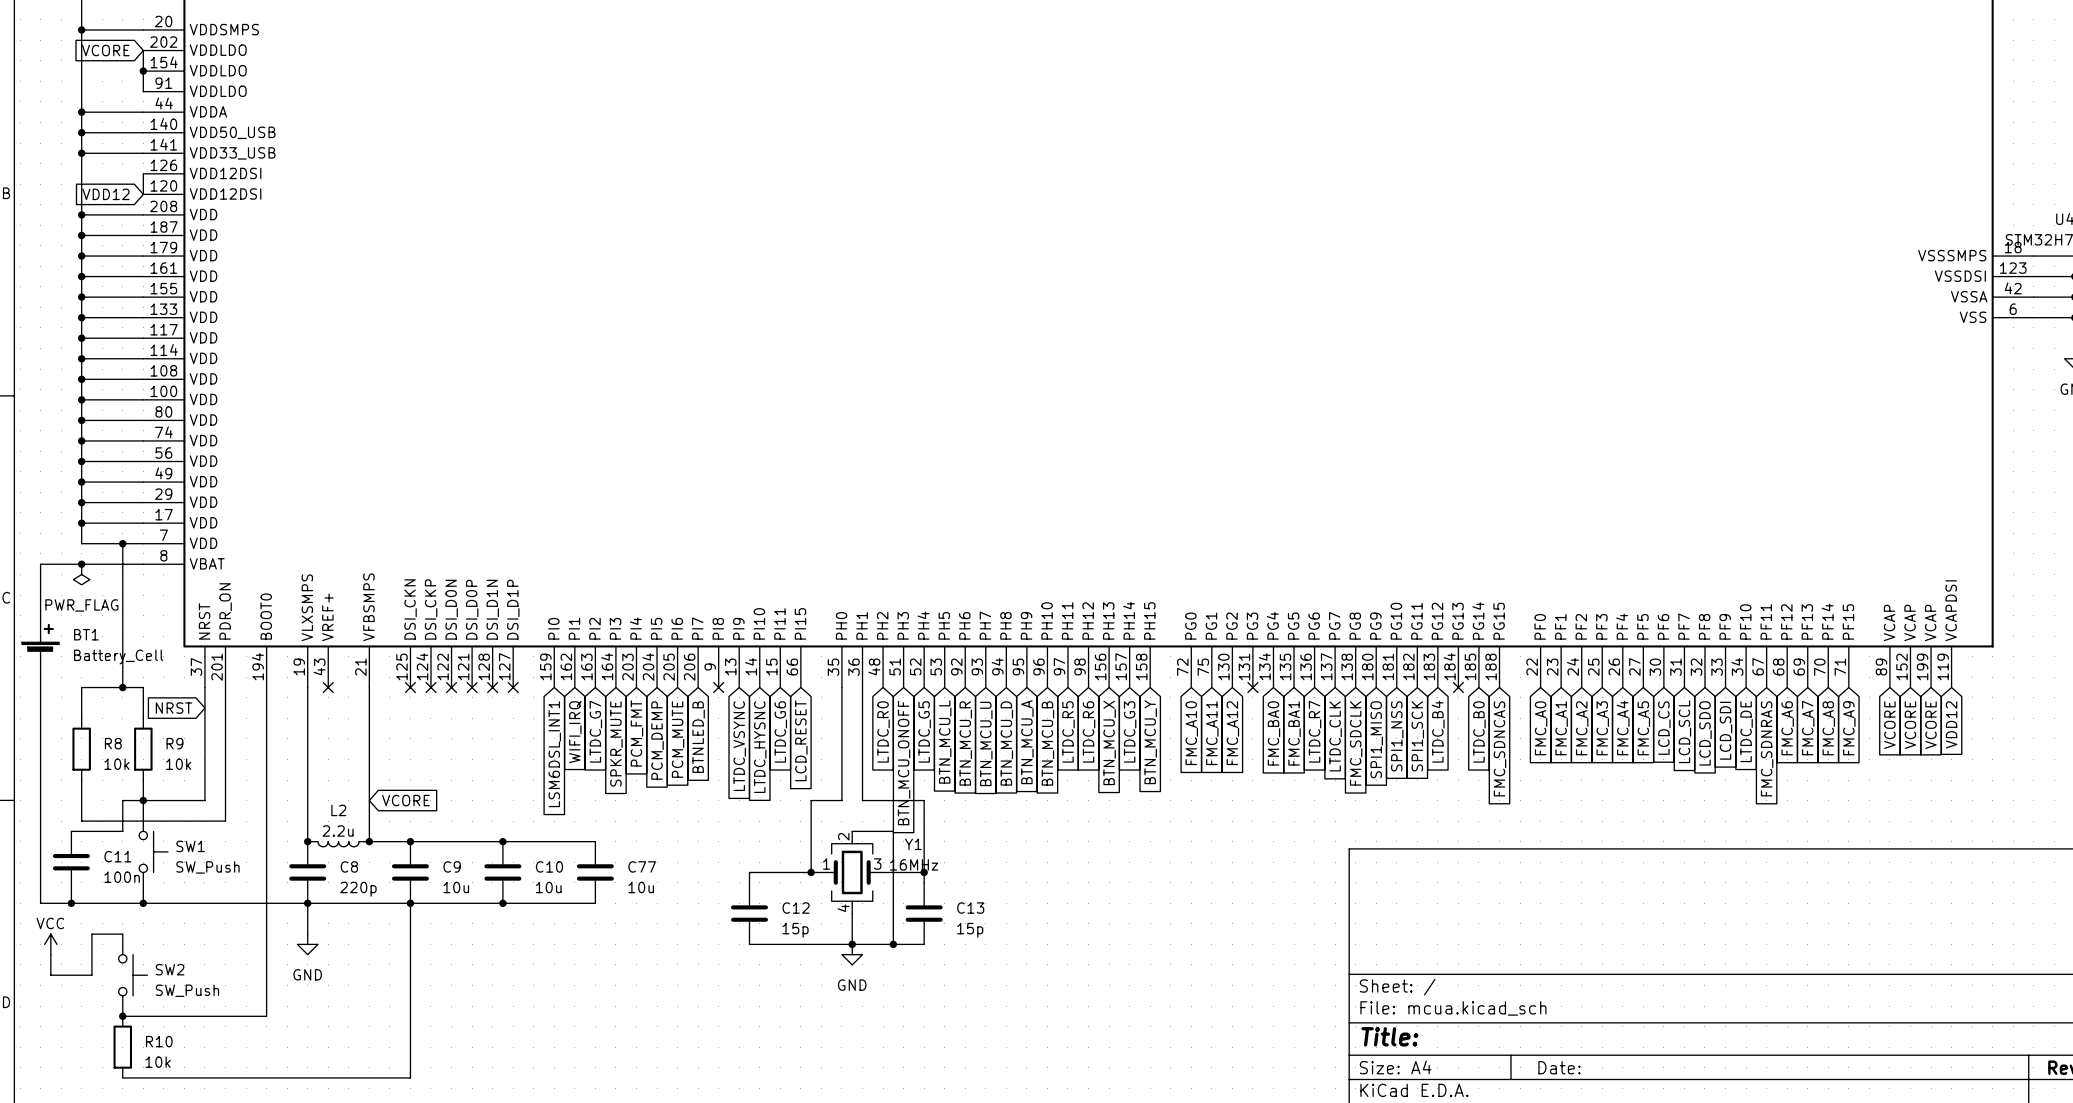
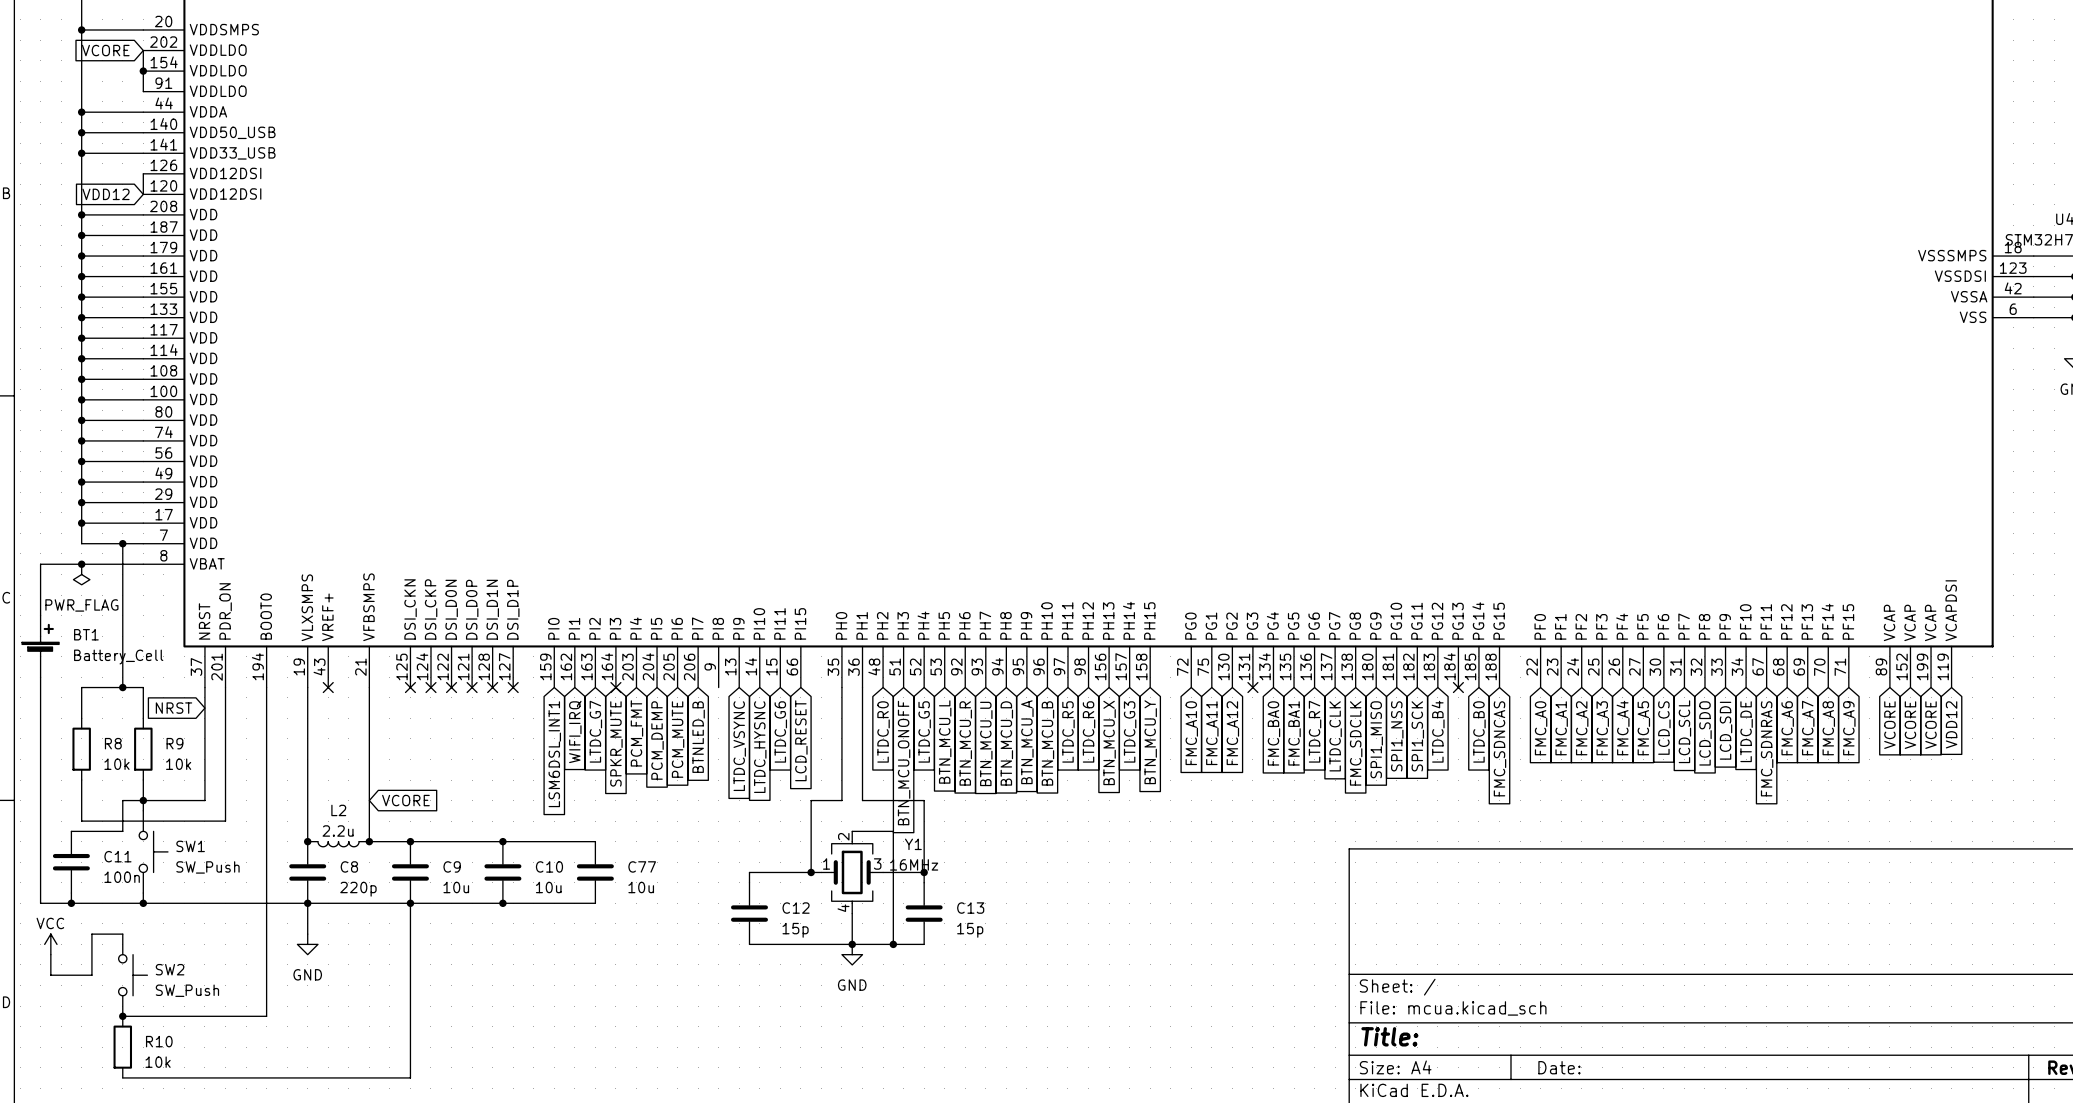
no-connect mark: none -> (615, 687)
no-connect mark: (718, 687) -> none

